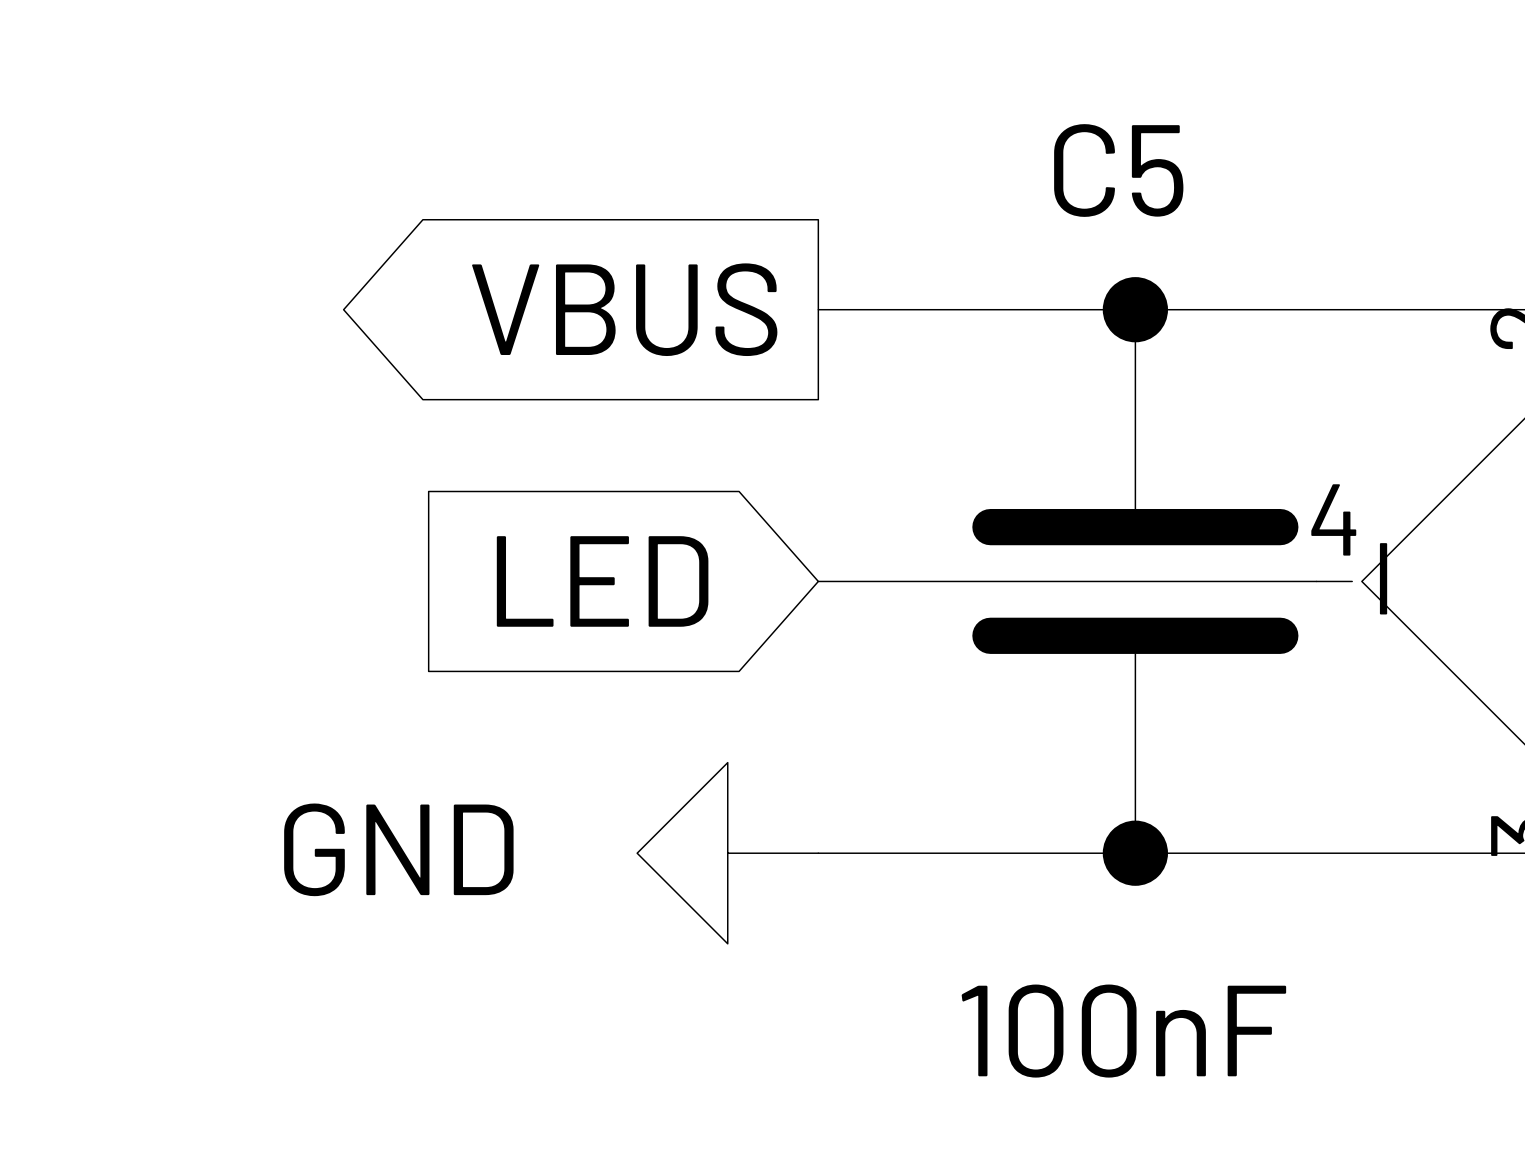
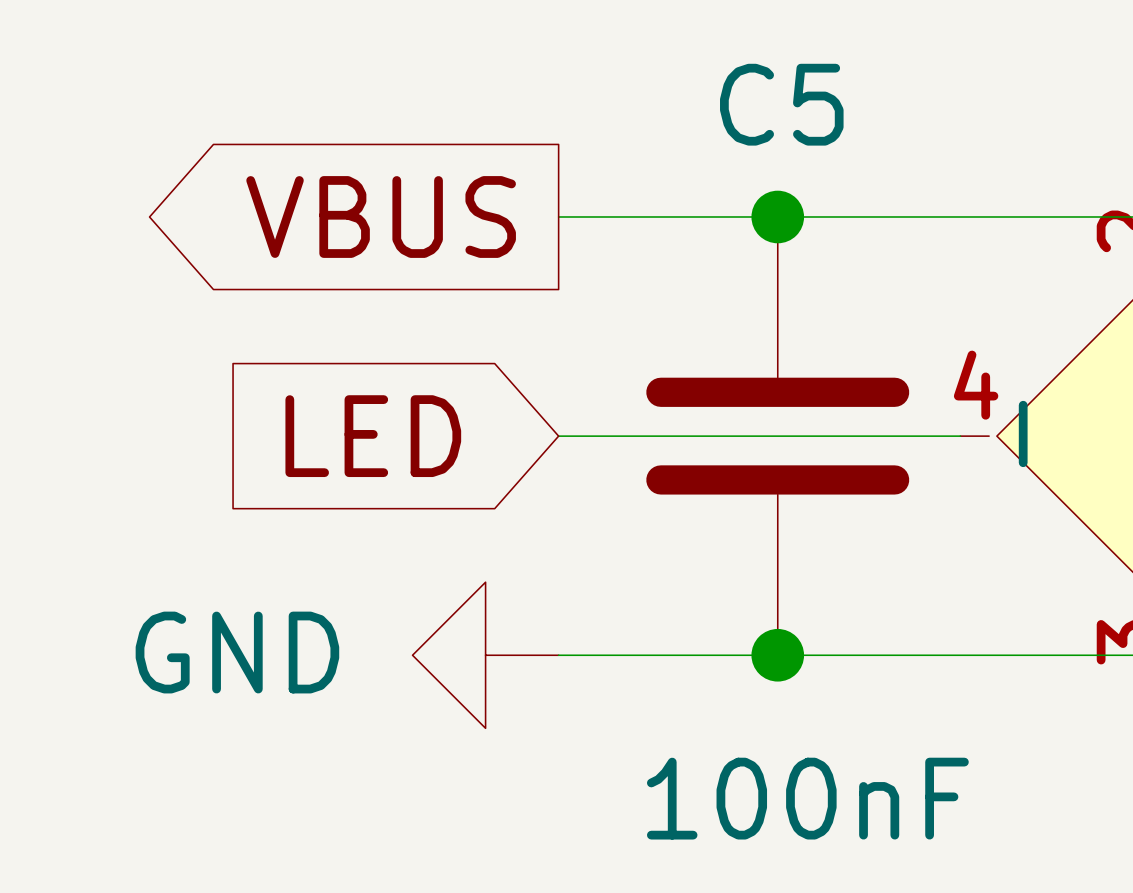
junction position: (1135, 309) -> (777, 216)
C5 position: (1135, 581) -> (777, 436)
junction position: (1135, 853) -> (777, 655)

